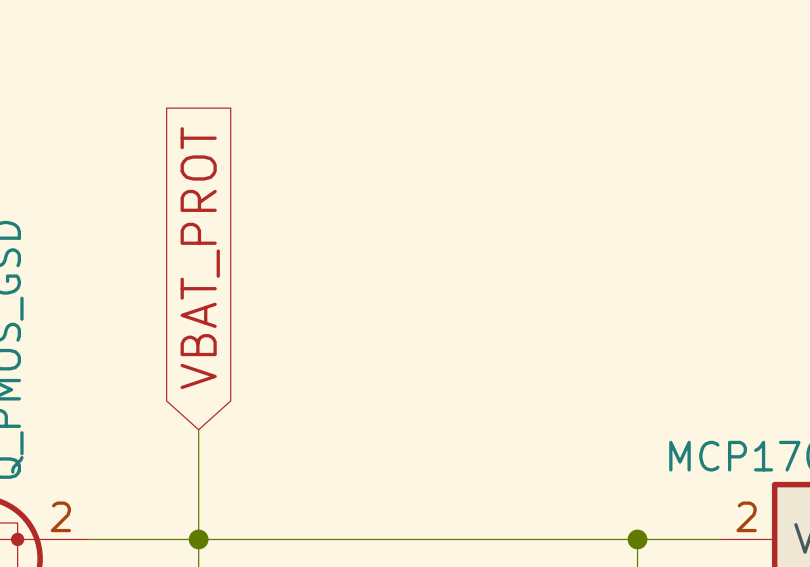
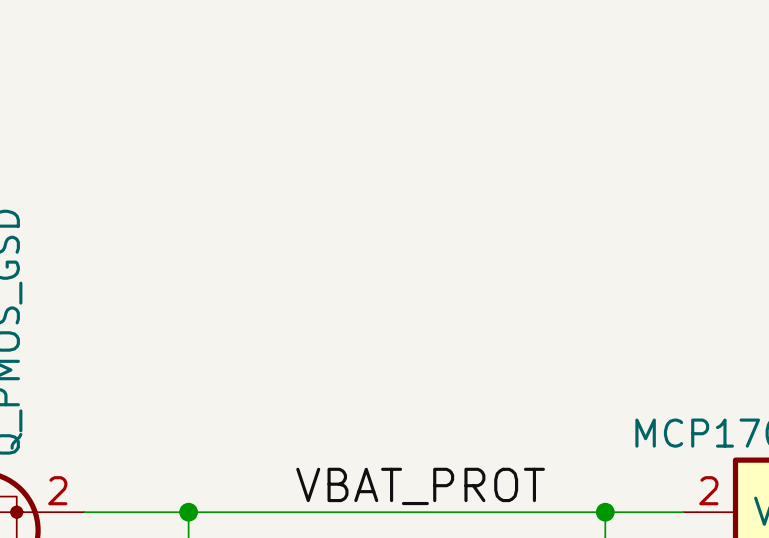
global label: VBAT_PROT (200, 258) -> none
wire: (198, 429) (198, 539) -> none
label: none -> VBAT_PROT (420, 486)

